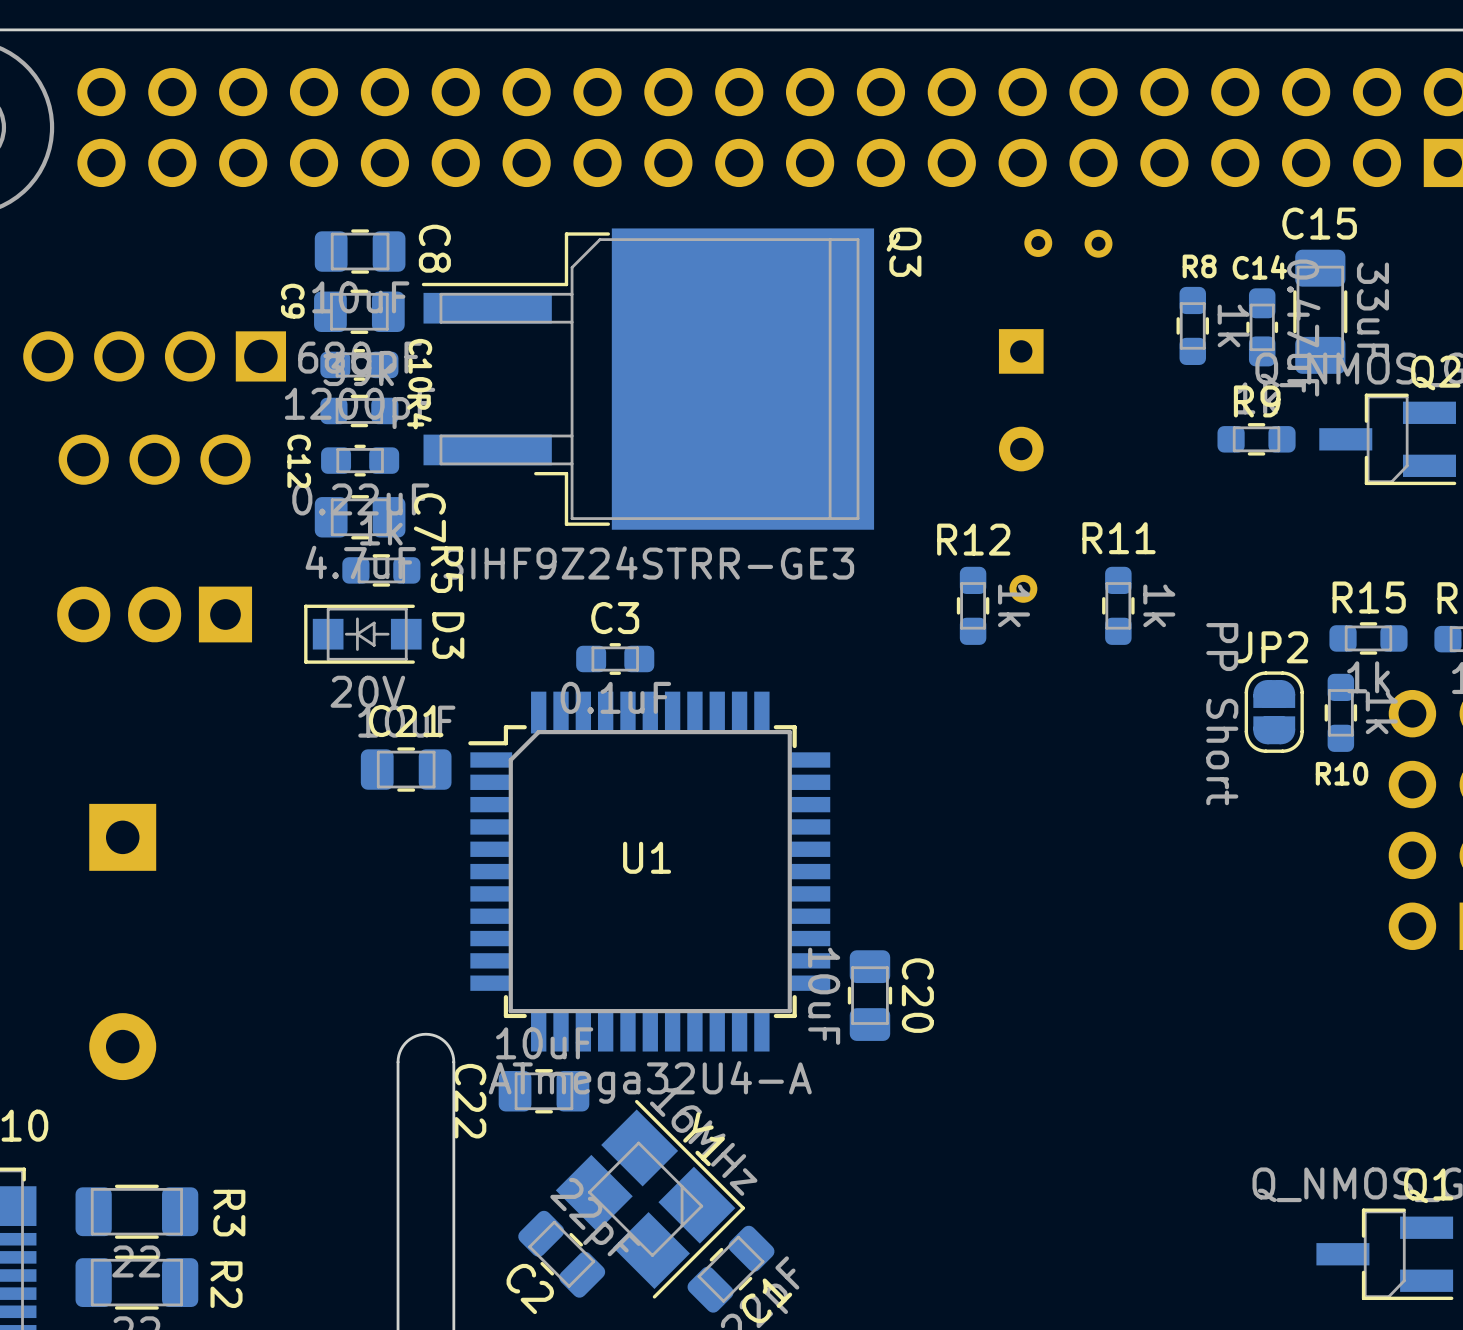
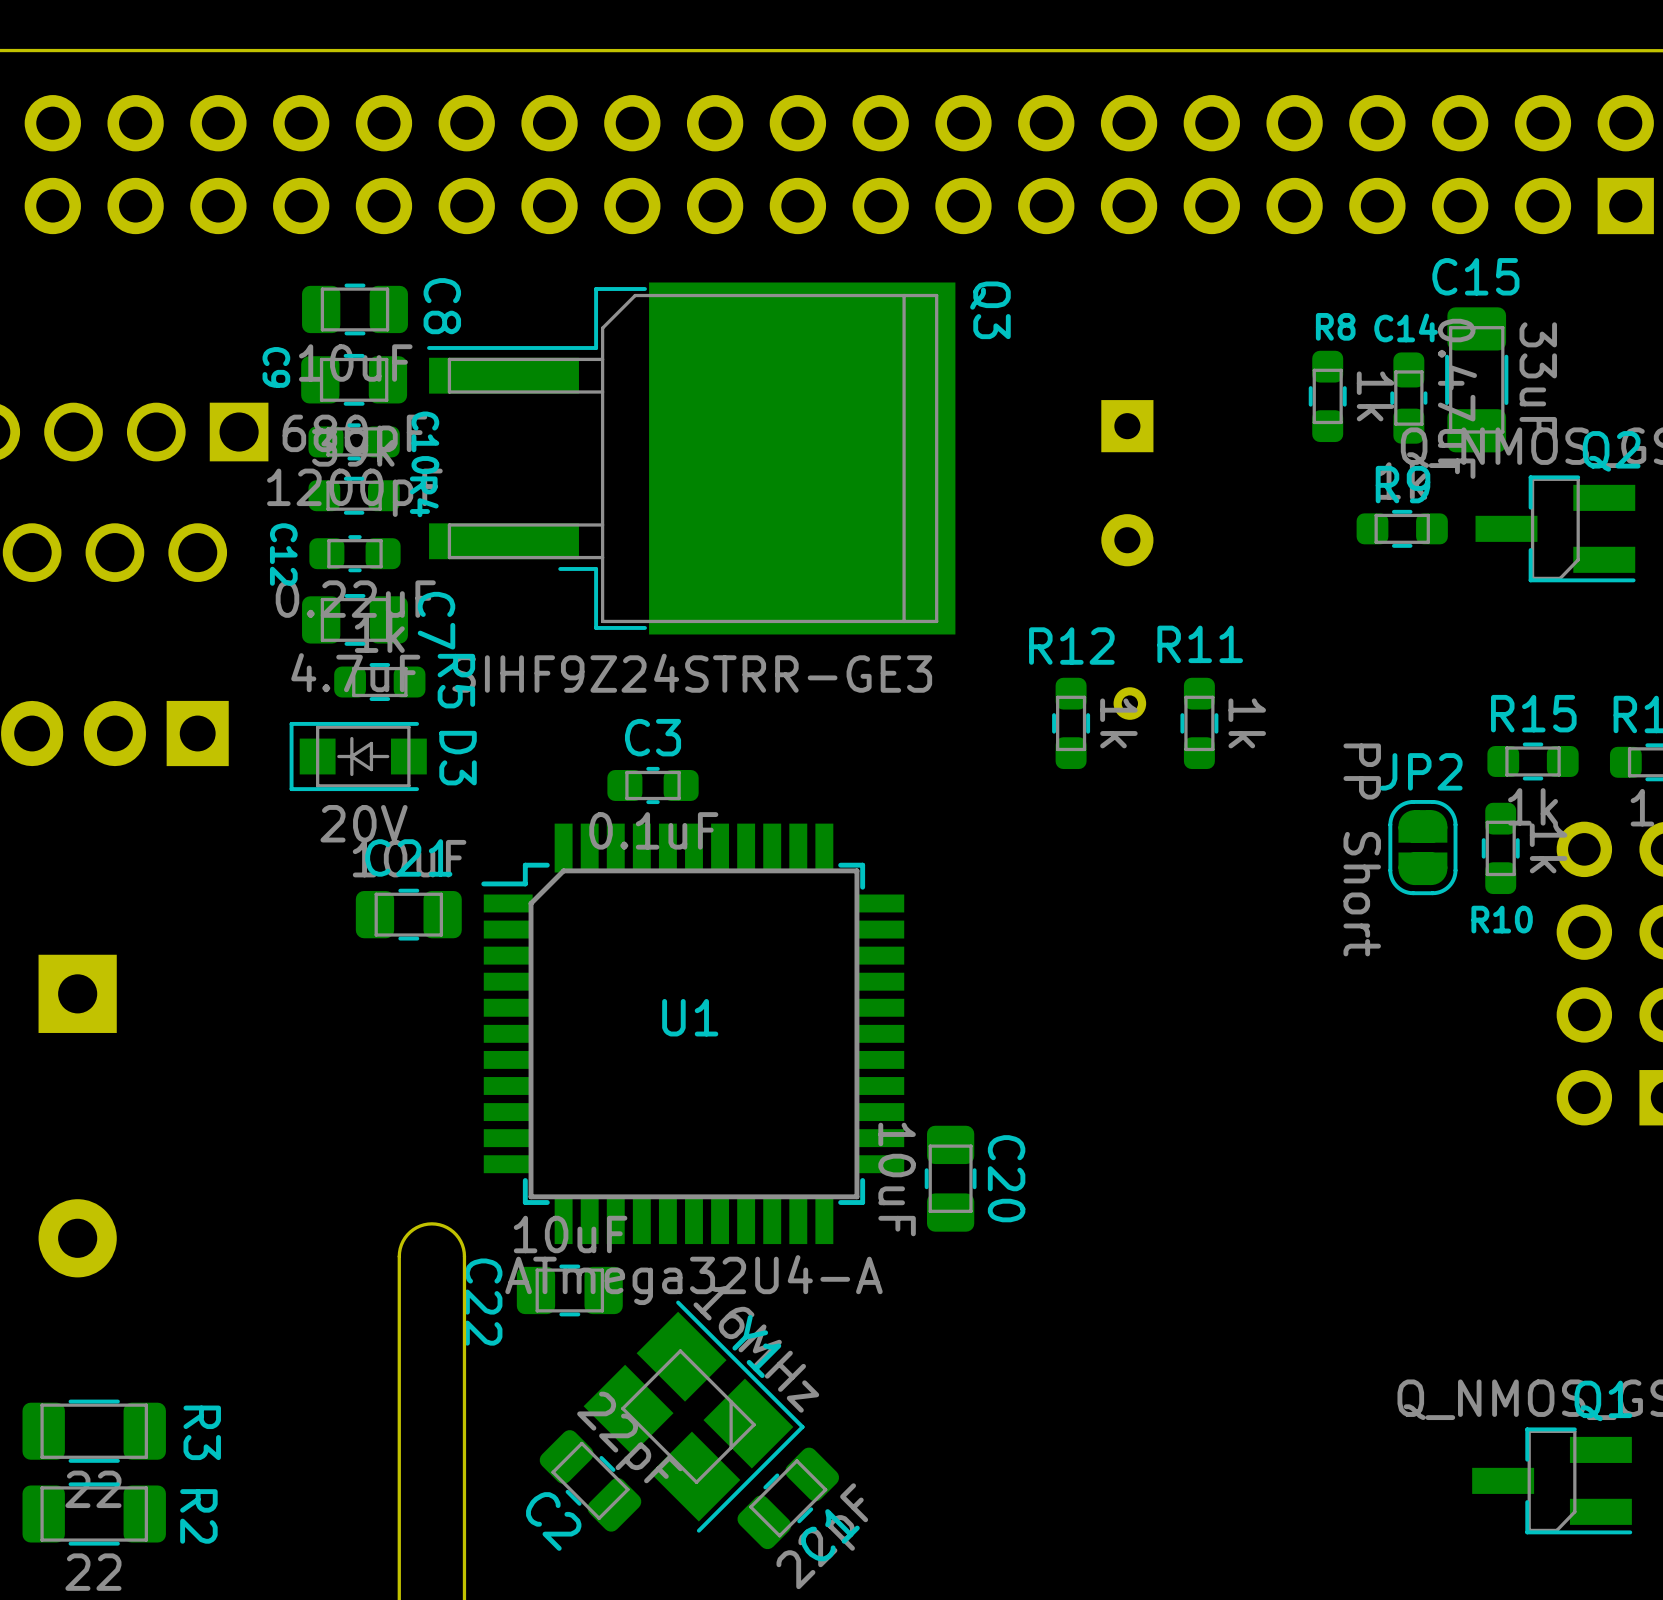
part: (1038, 243) -> none
part: (1098, 243) -> none
R11 position: (1118, 605) -> (1199, 723)

